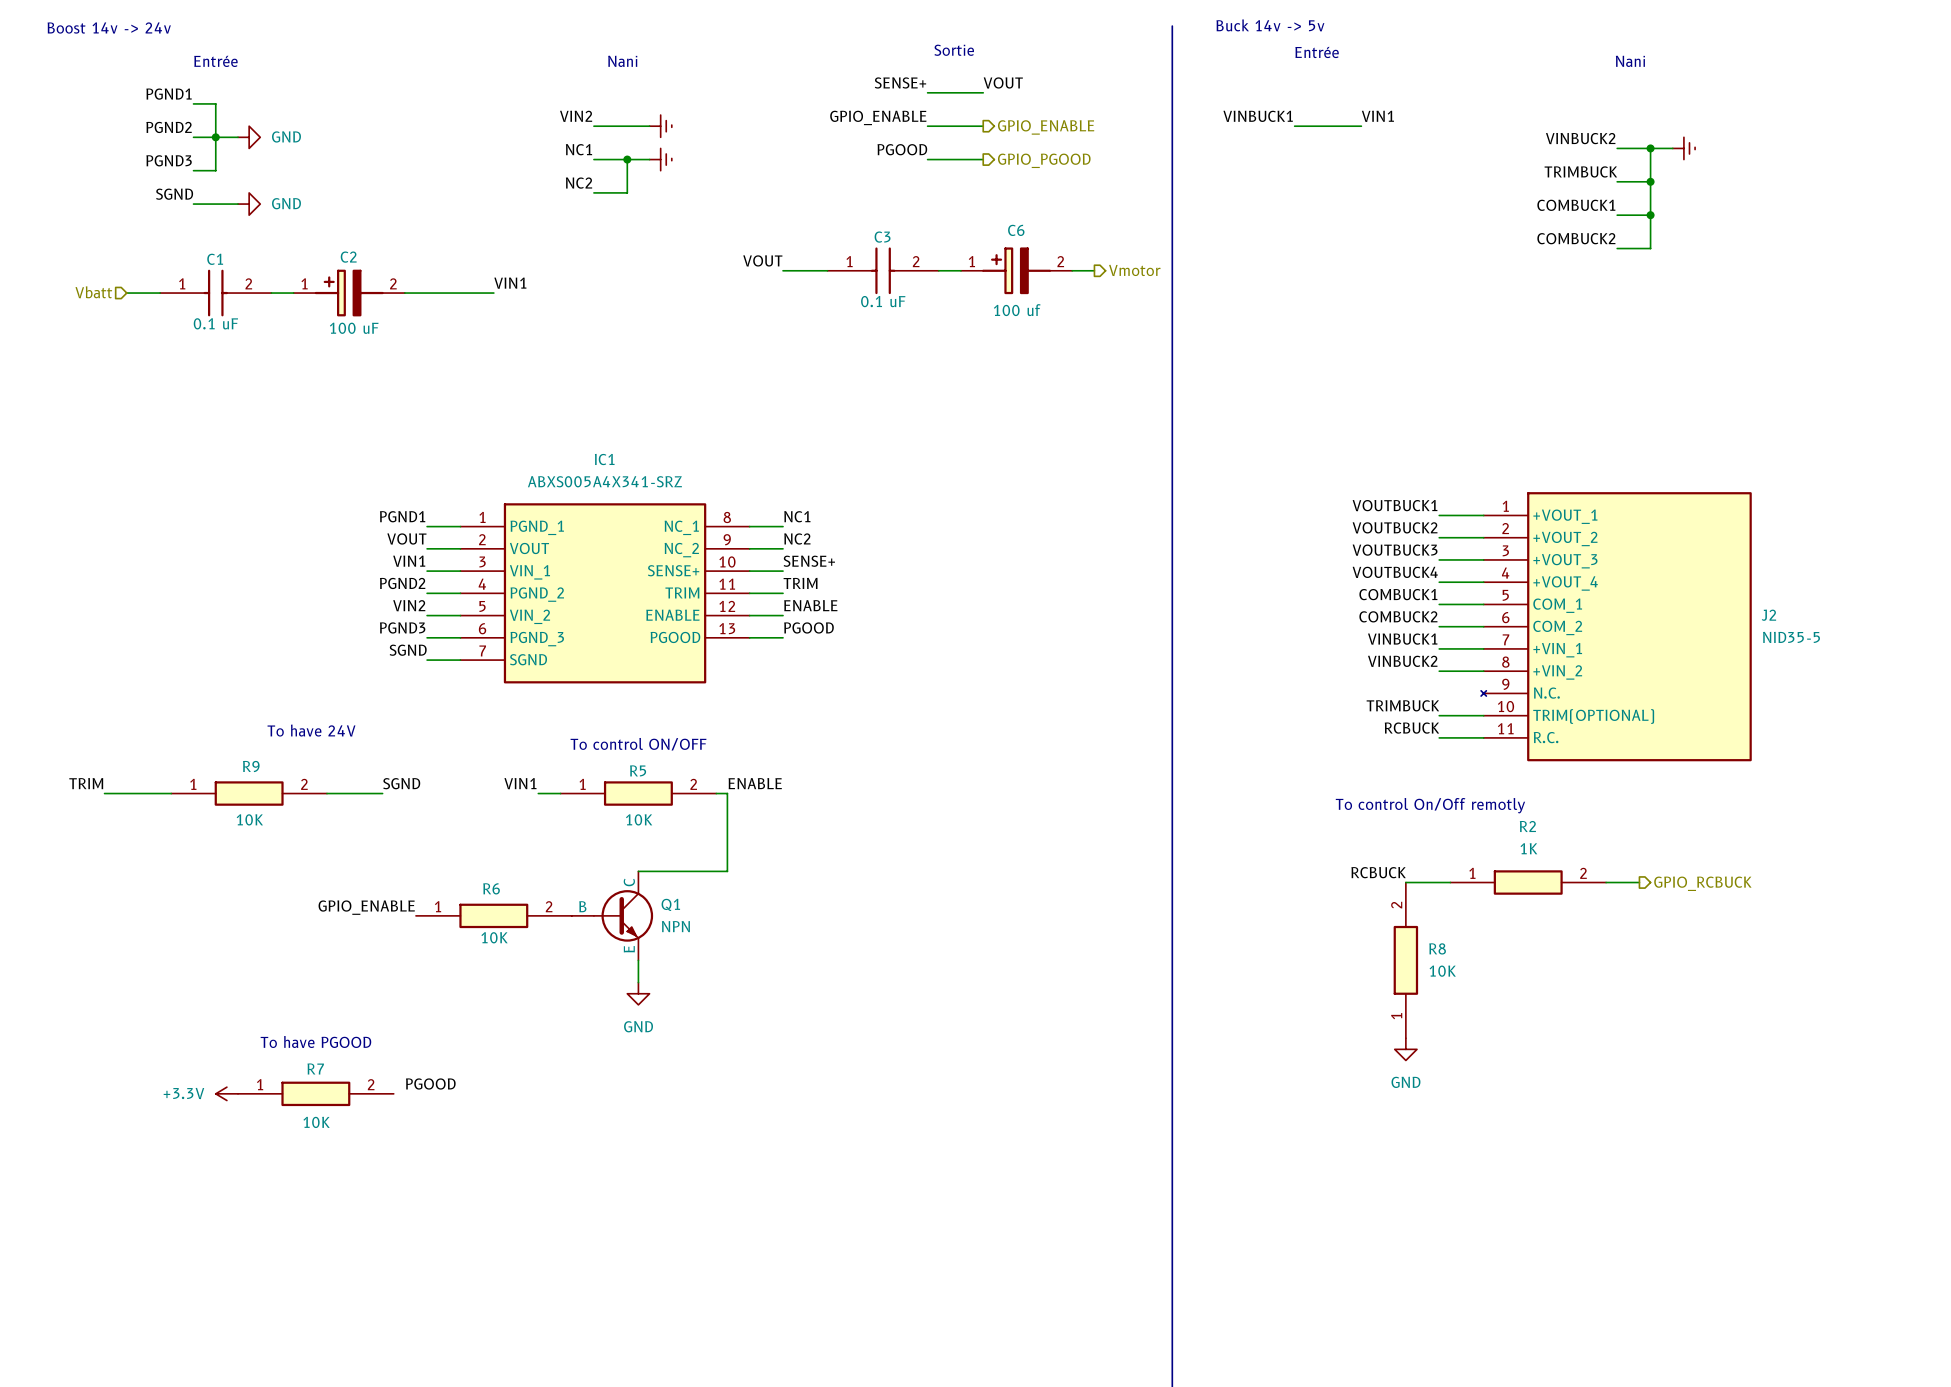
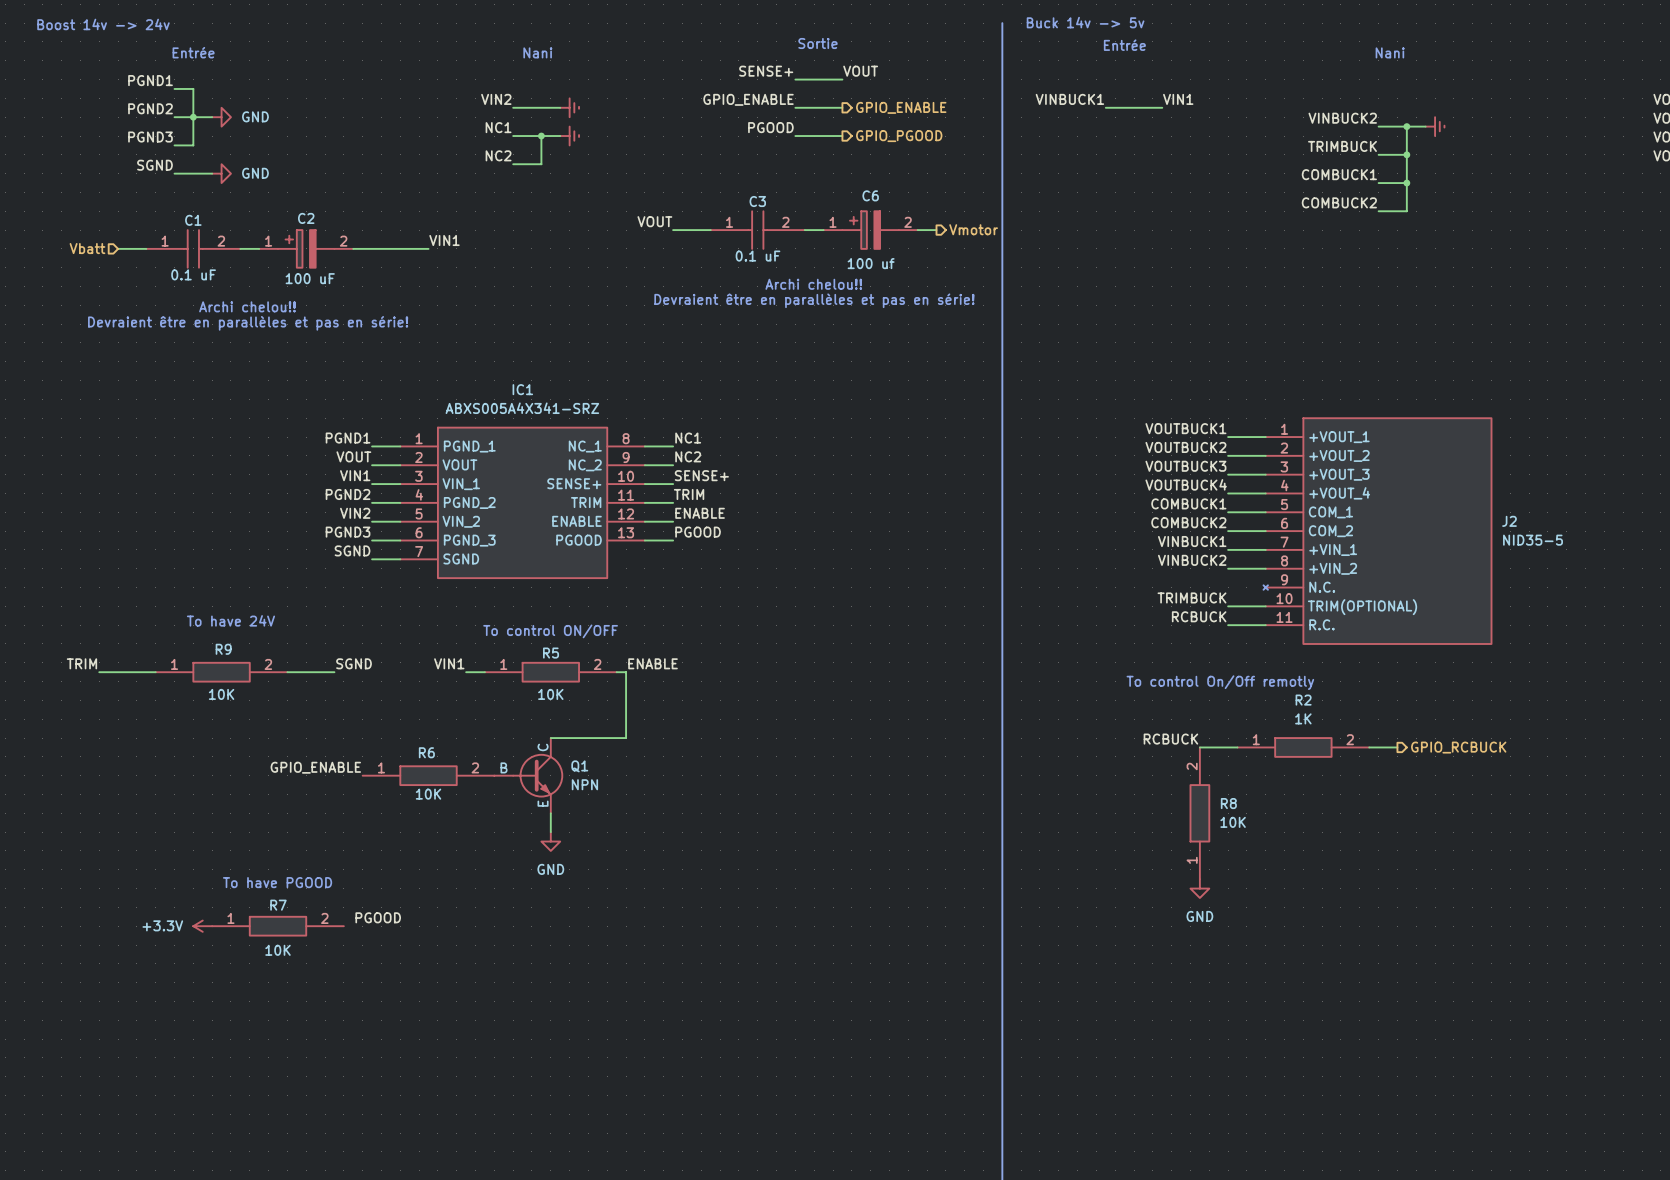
text: none -> Archi chelou!! (813, 284)
text: none -> Devraient être en parallèles et pas en série! (814, 300)
text: none -> Archi chelou!! (247, 306)
text: none -> Devraient être en parallèles et pas en série! (248, 323)
text position: To have 24V (311, 730) -> To have 24V (230, 620)

